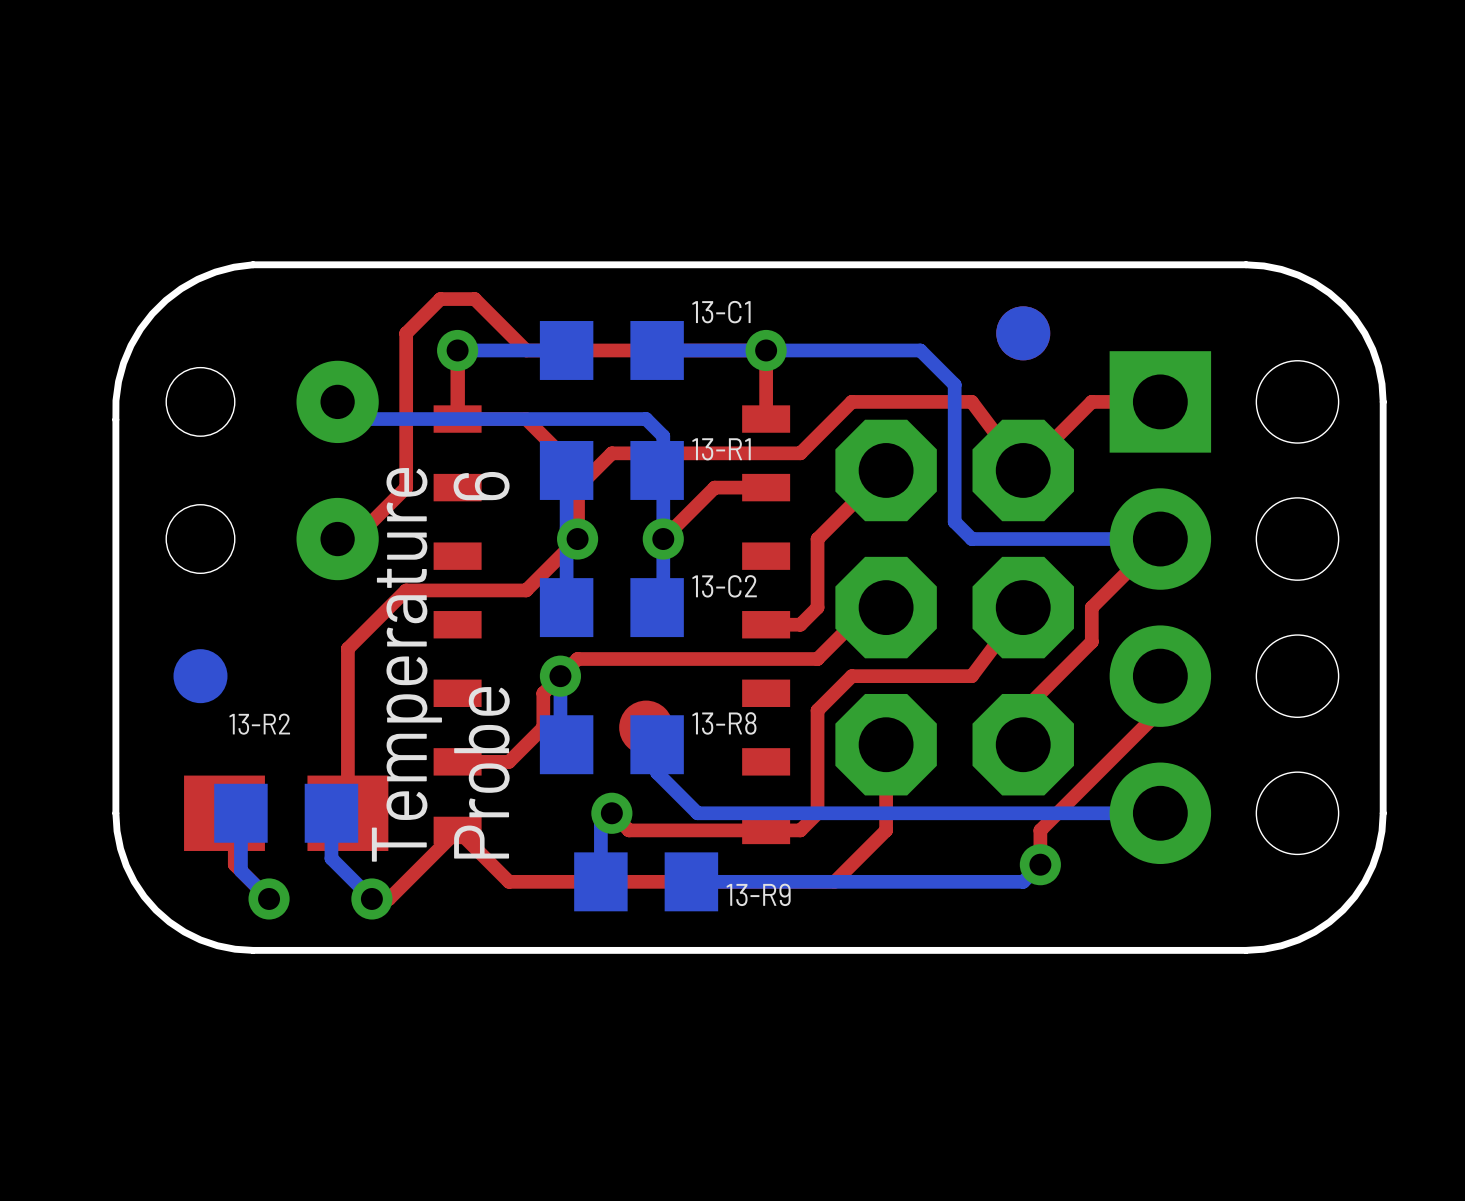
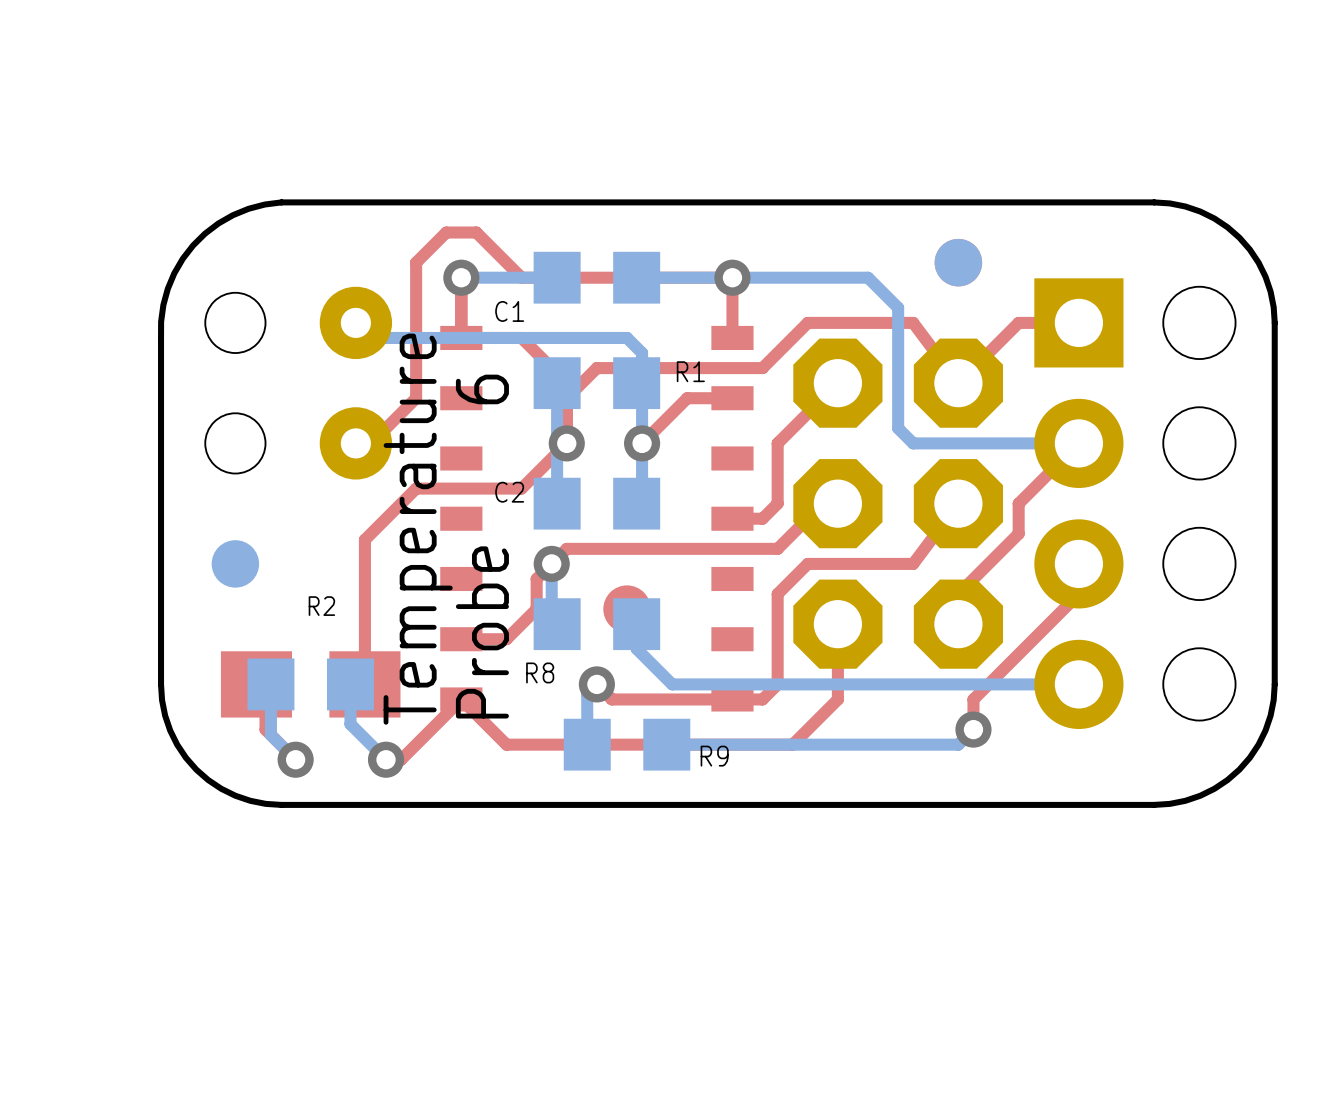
13-C1 name: 13-C1 (721, 312) -> C1 (509, 311)
13-R1 name: 13-R1 (721, 449) -> R1 (690, 371)
13-C2 name: 13-C2 (724, 586) -> C2 (509, 492)
13-R8 name: 13-R8 (724, 723) -> R8 (540, 672)
13-R2 name: 13-R2 (259, 724) -> R2 (321, 606)
13-R9 name: 13-R9 (758, 894) -> R9 (714, 756)

